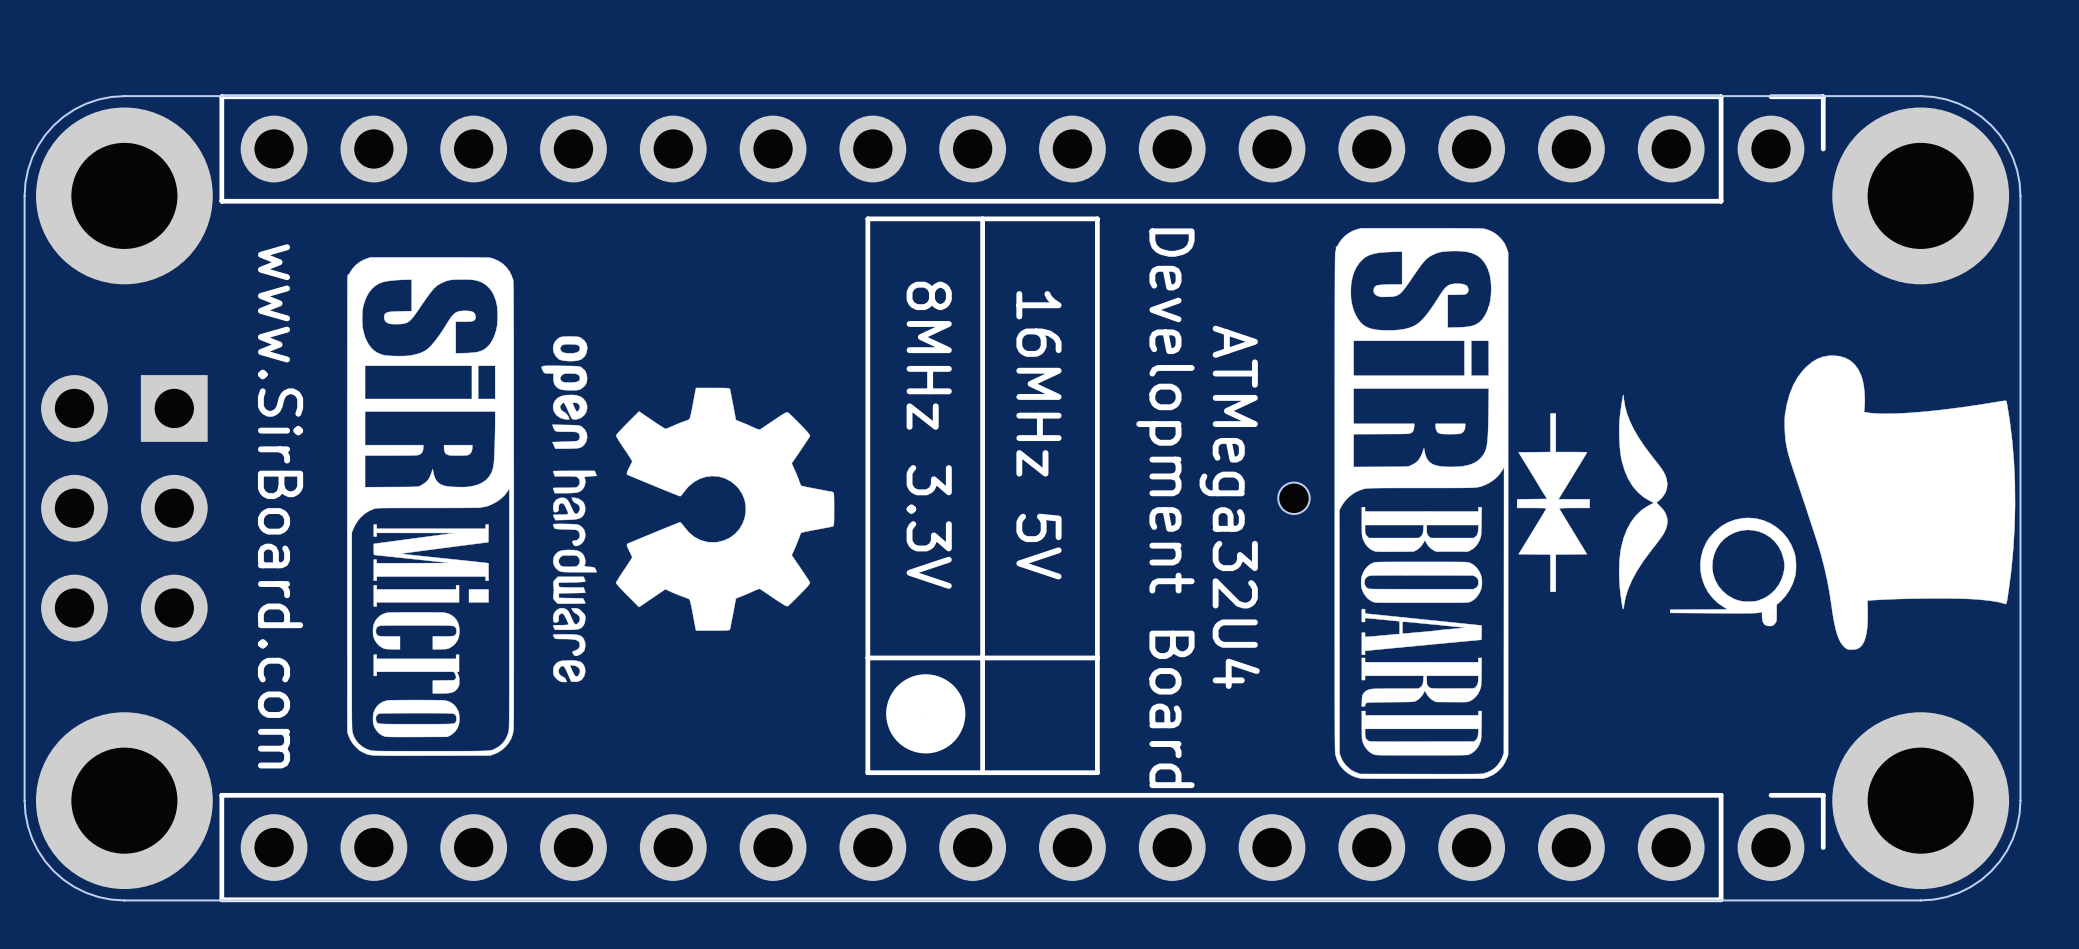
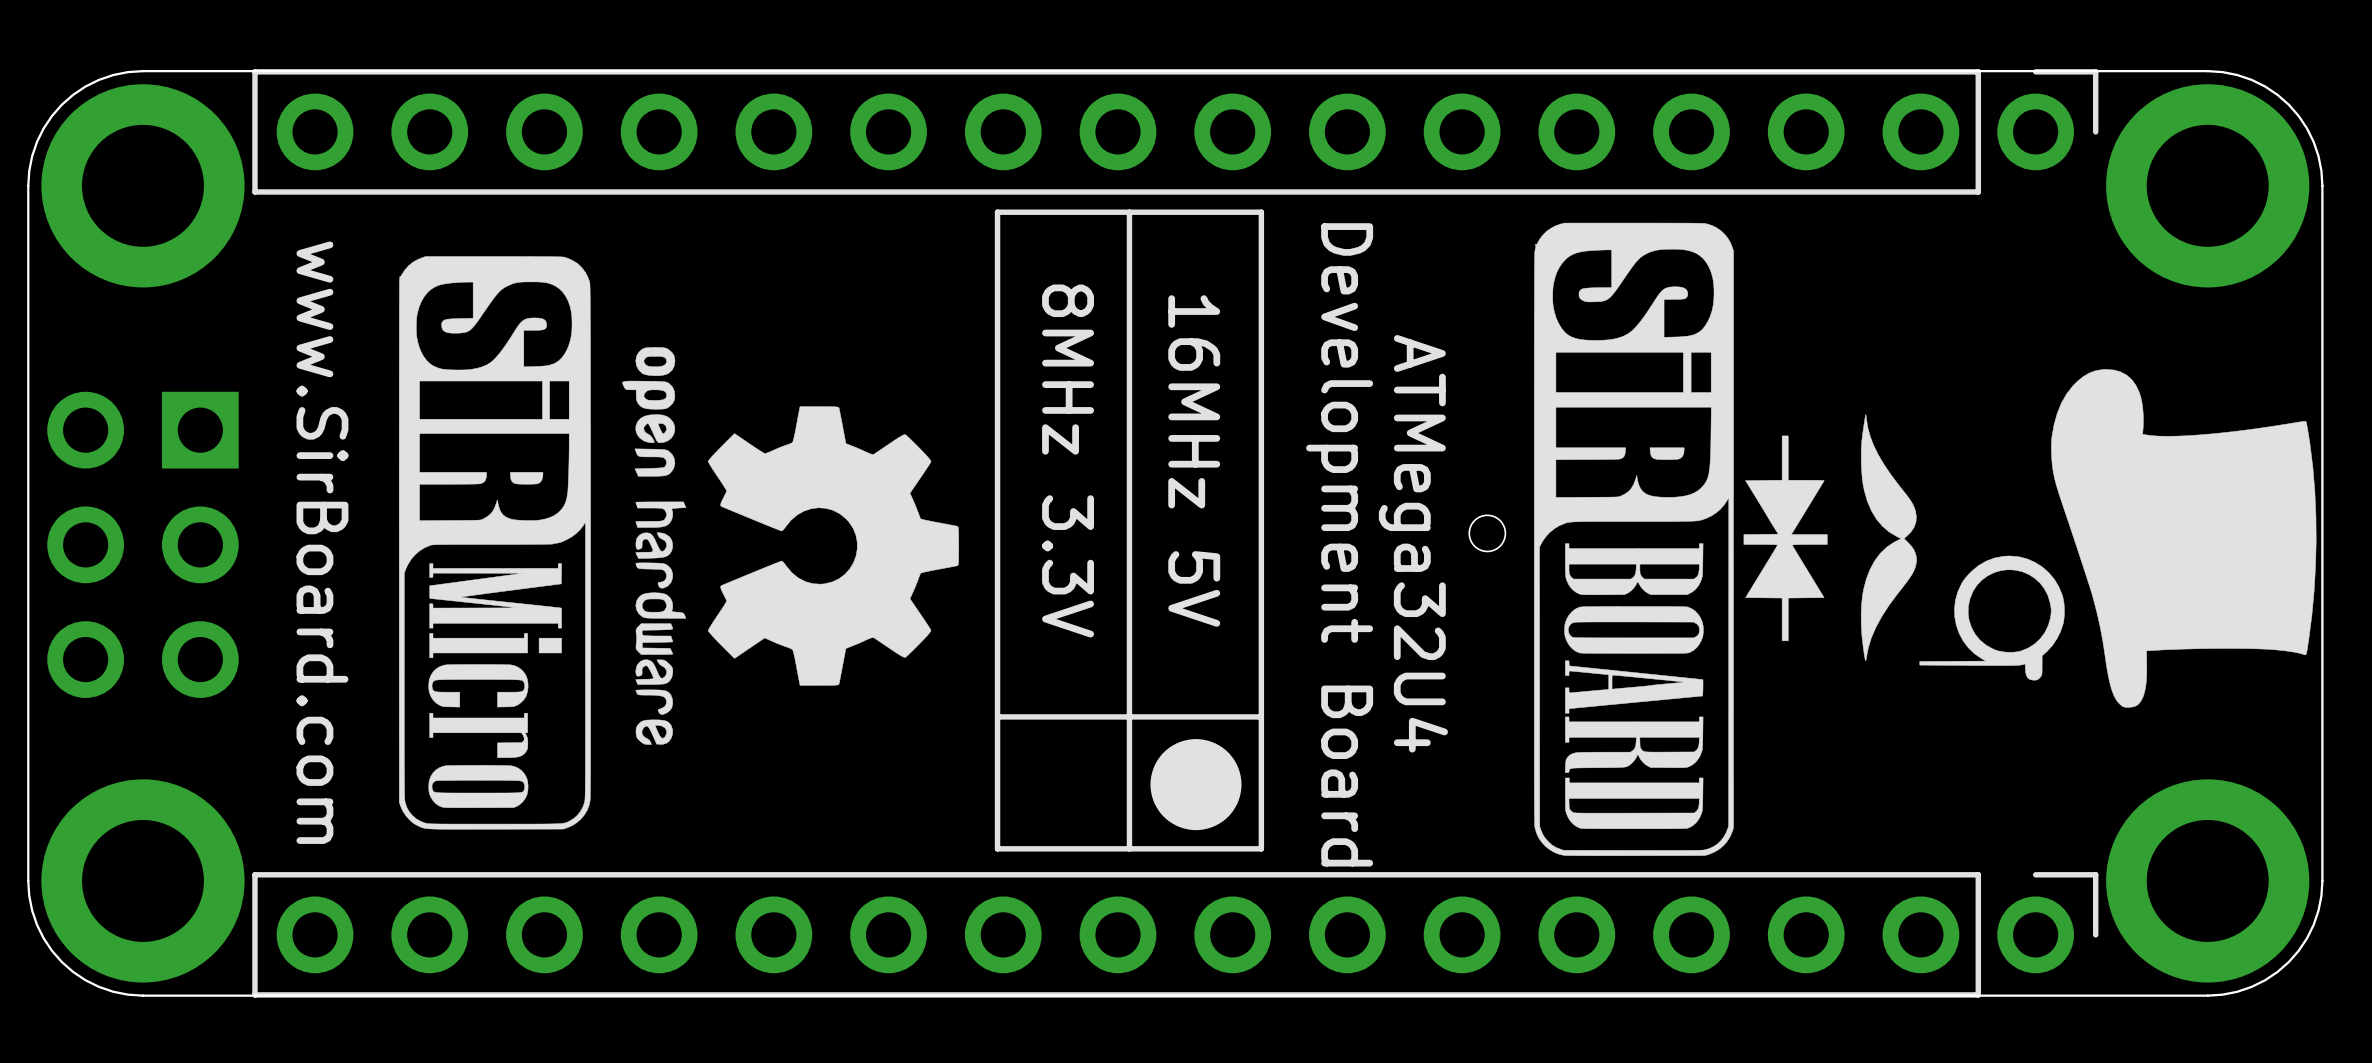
drawing position: (925, 713) -> (1195, 784)

